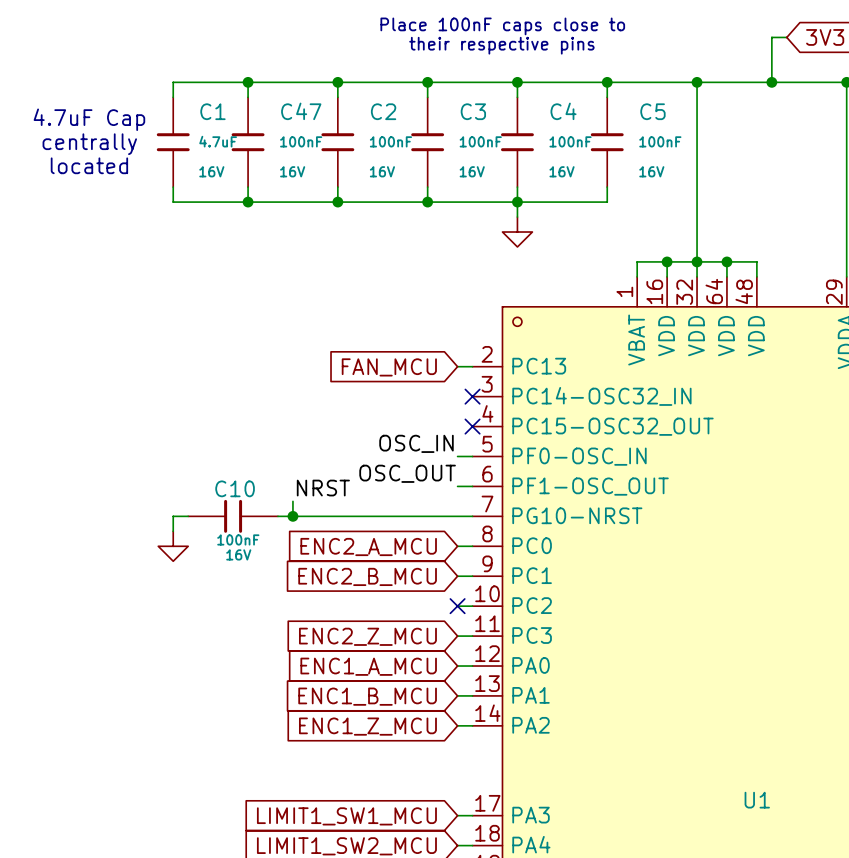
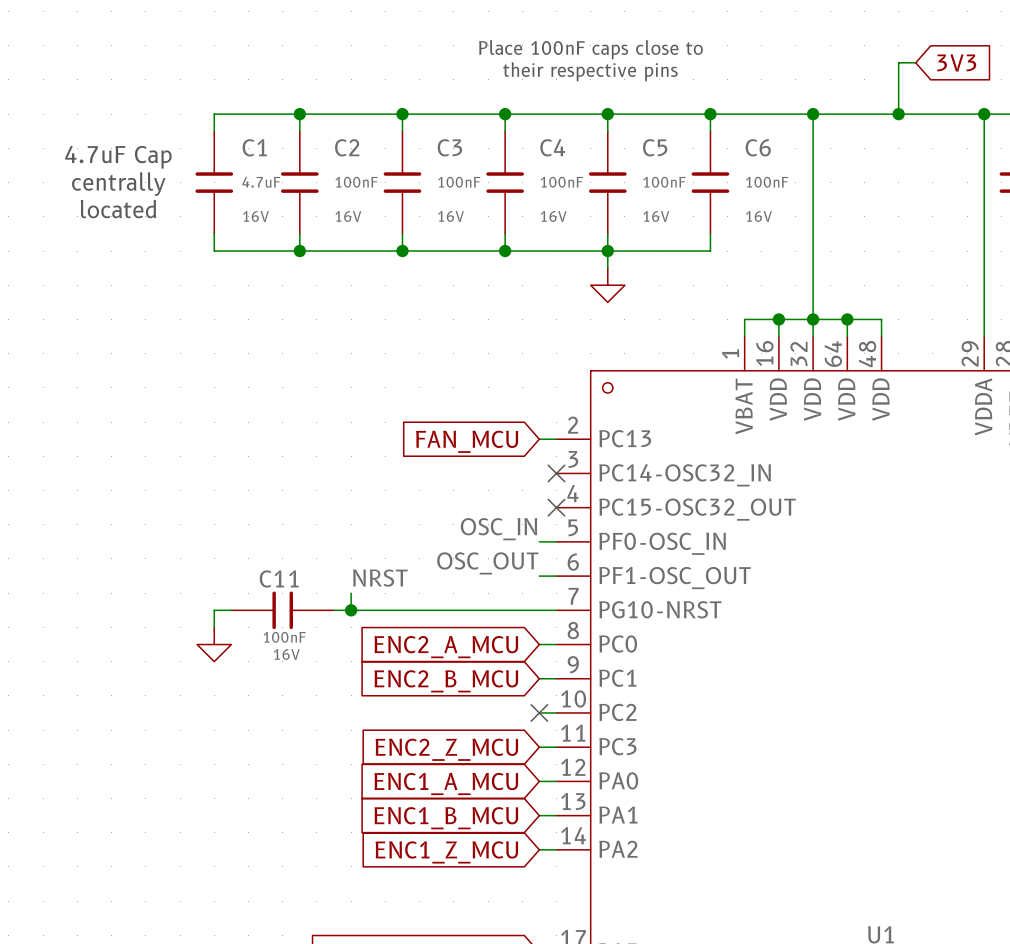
C47 name: C47 (301, 111) -> C2 (347, 147)
C2 name: C2 (383, 111) -> C3 (449, 147)
C3 name: C3 (473, 111) -> C4 (552, 147)
C4 name: C4 (563, 111) -> C5 (655, 147)
C5 name: C5 (652, 111) -> C6 (758, 147)
C10 name: C10 (235, 488) -> C11 (279, 578)

